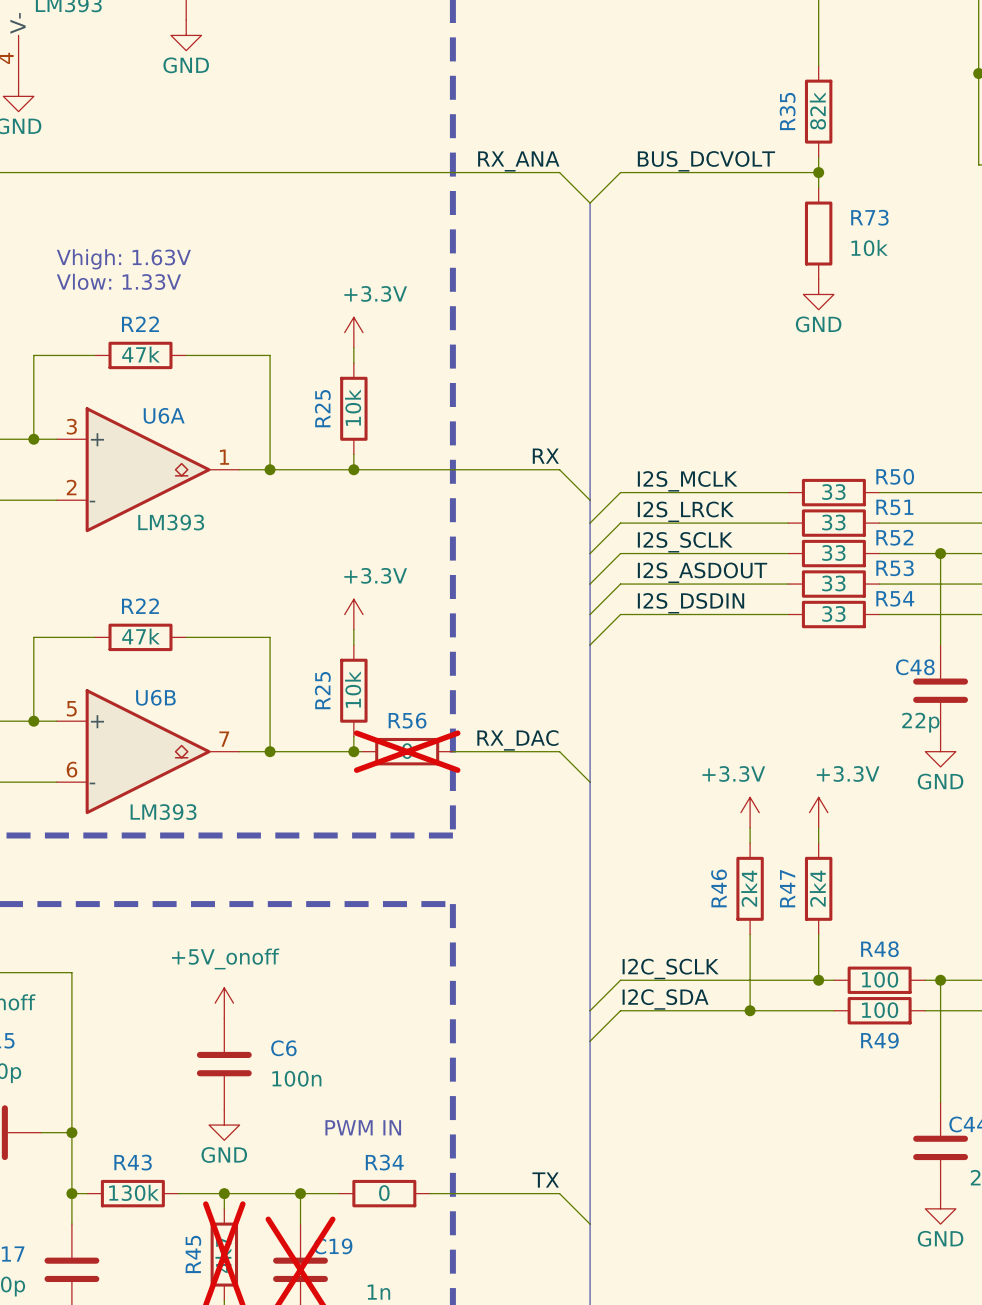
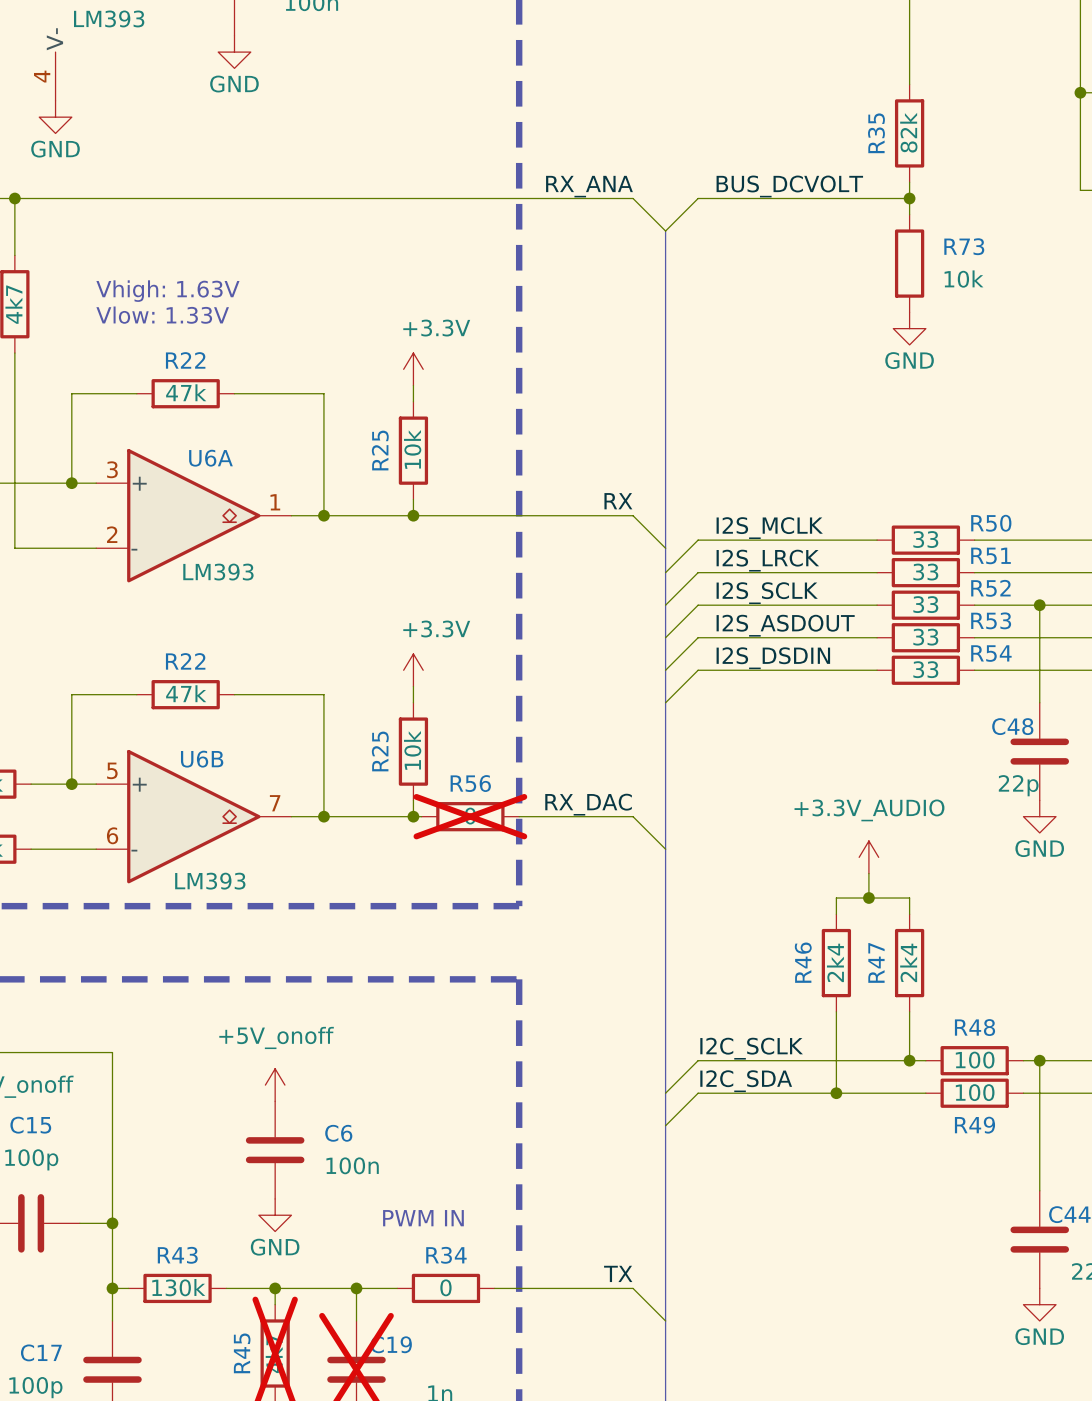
power symbol: none -> +3.3V_AUDIO (868, 857)
wire: none -> (868, 873) (868, 898)
power symbol: +3.3V (750, 812) -> none
power symbol: +3.3V (818, 812) -> none
wire: none -> (836, 898) (909, 898)
junction: none -> (868, 898)

